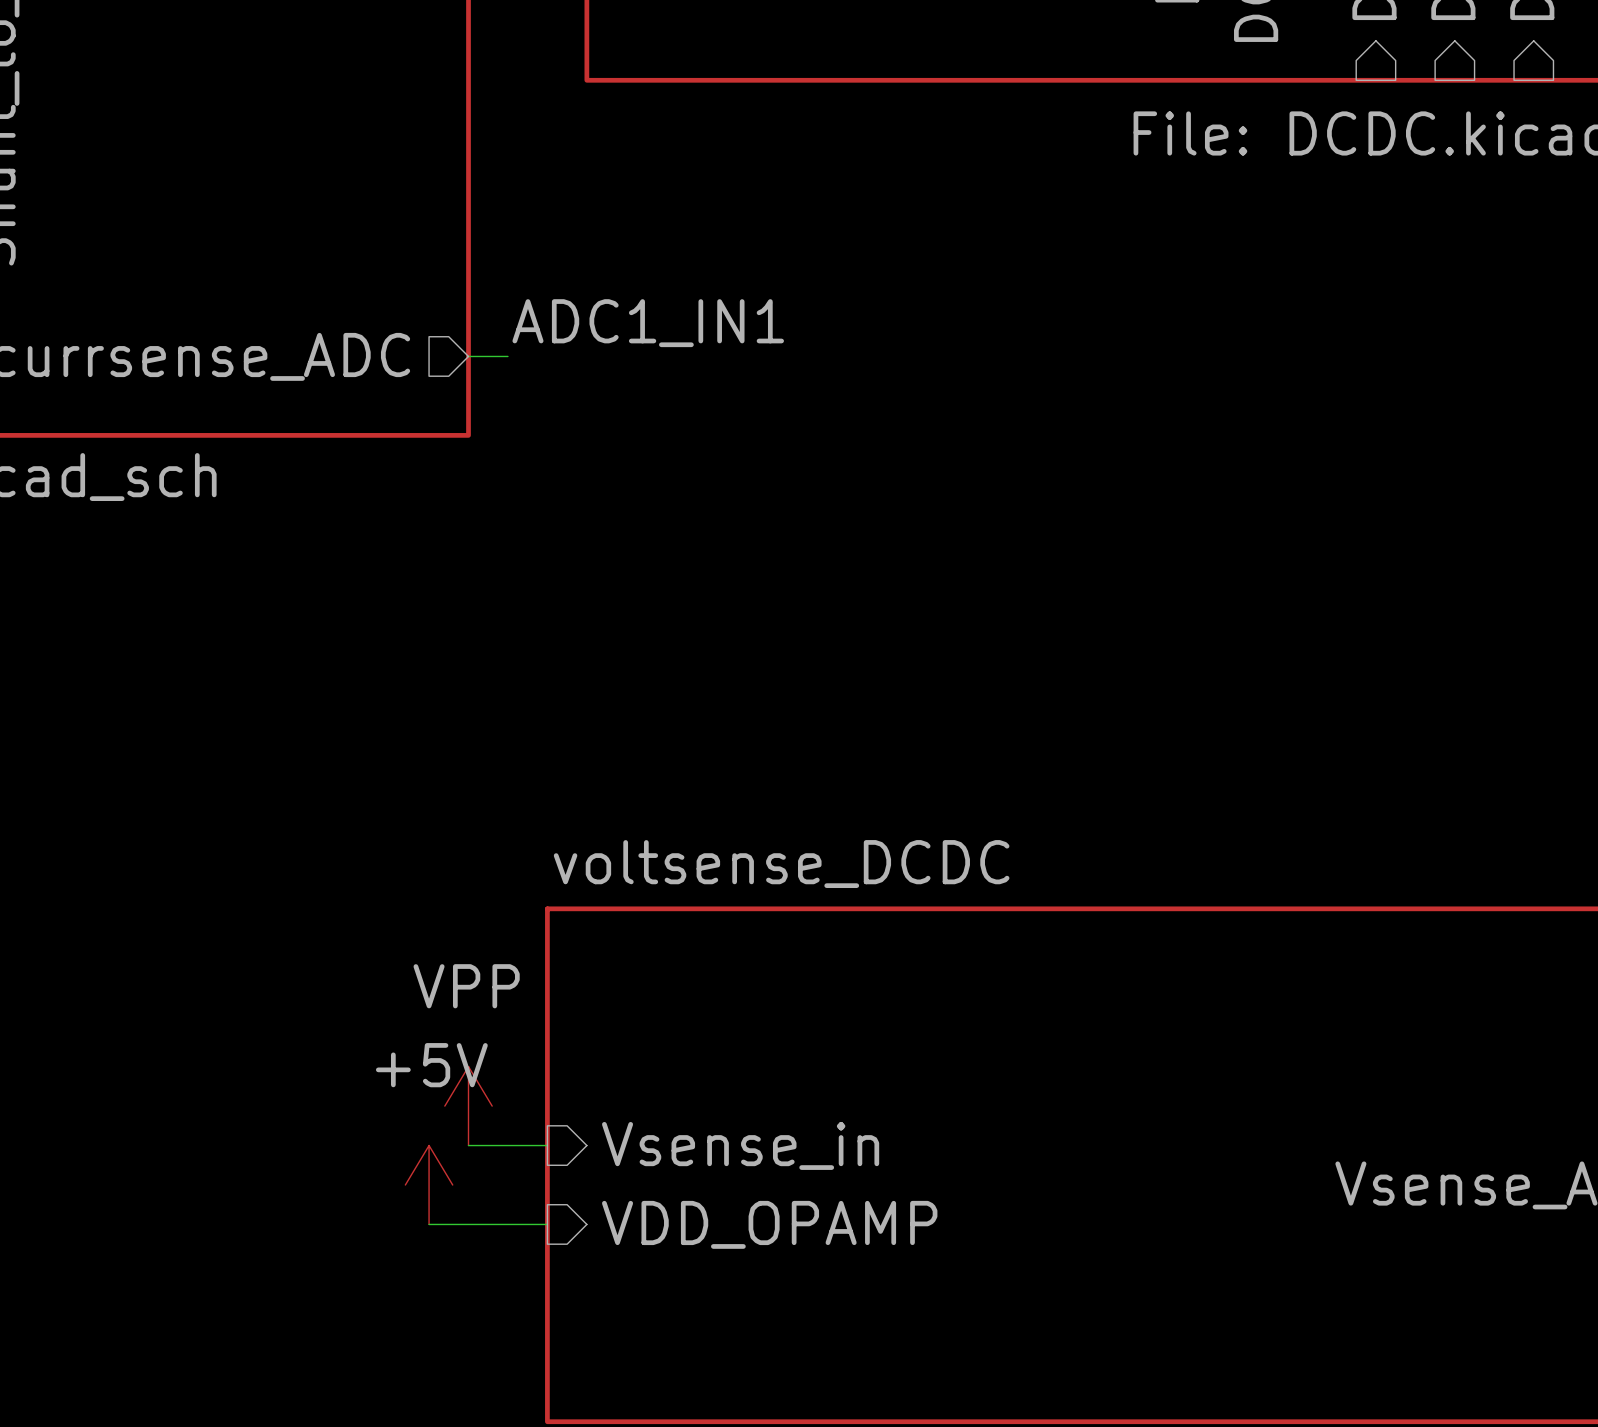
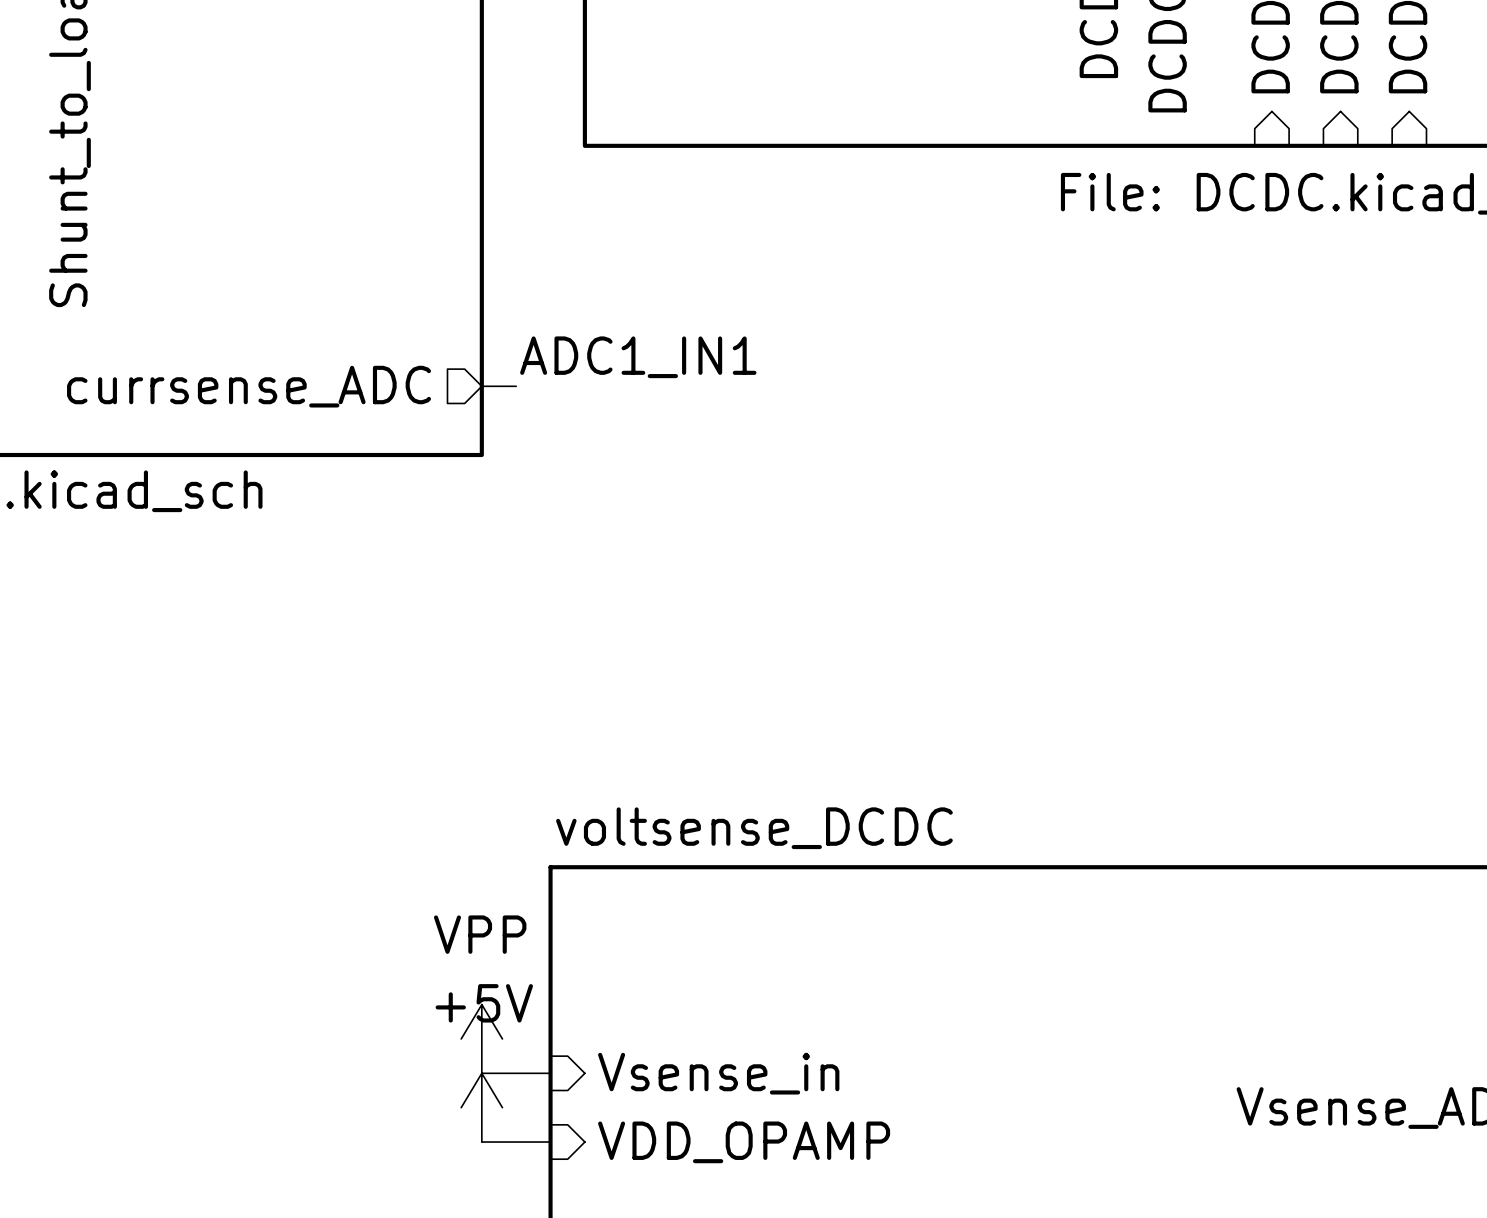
power symbol position: +5V (429, 1185) -> +5V (481, 1107)
wire: (429, 1224) (468, 1224) -> none

